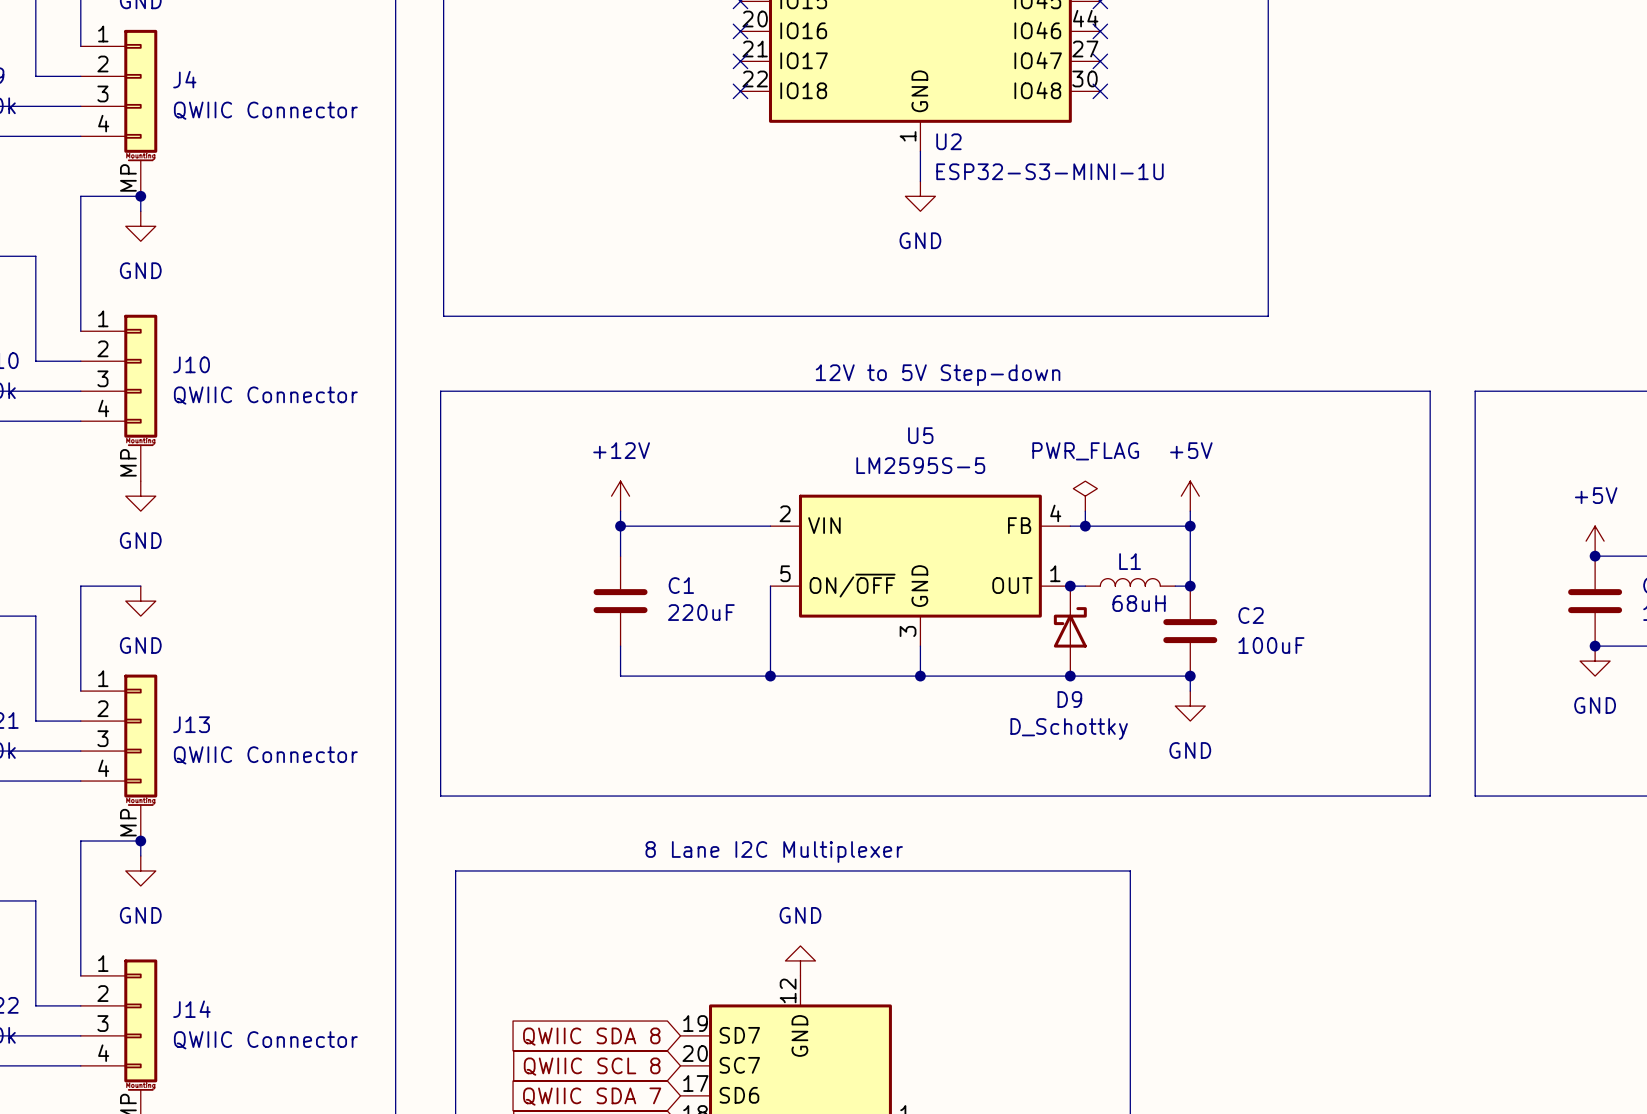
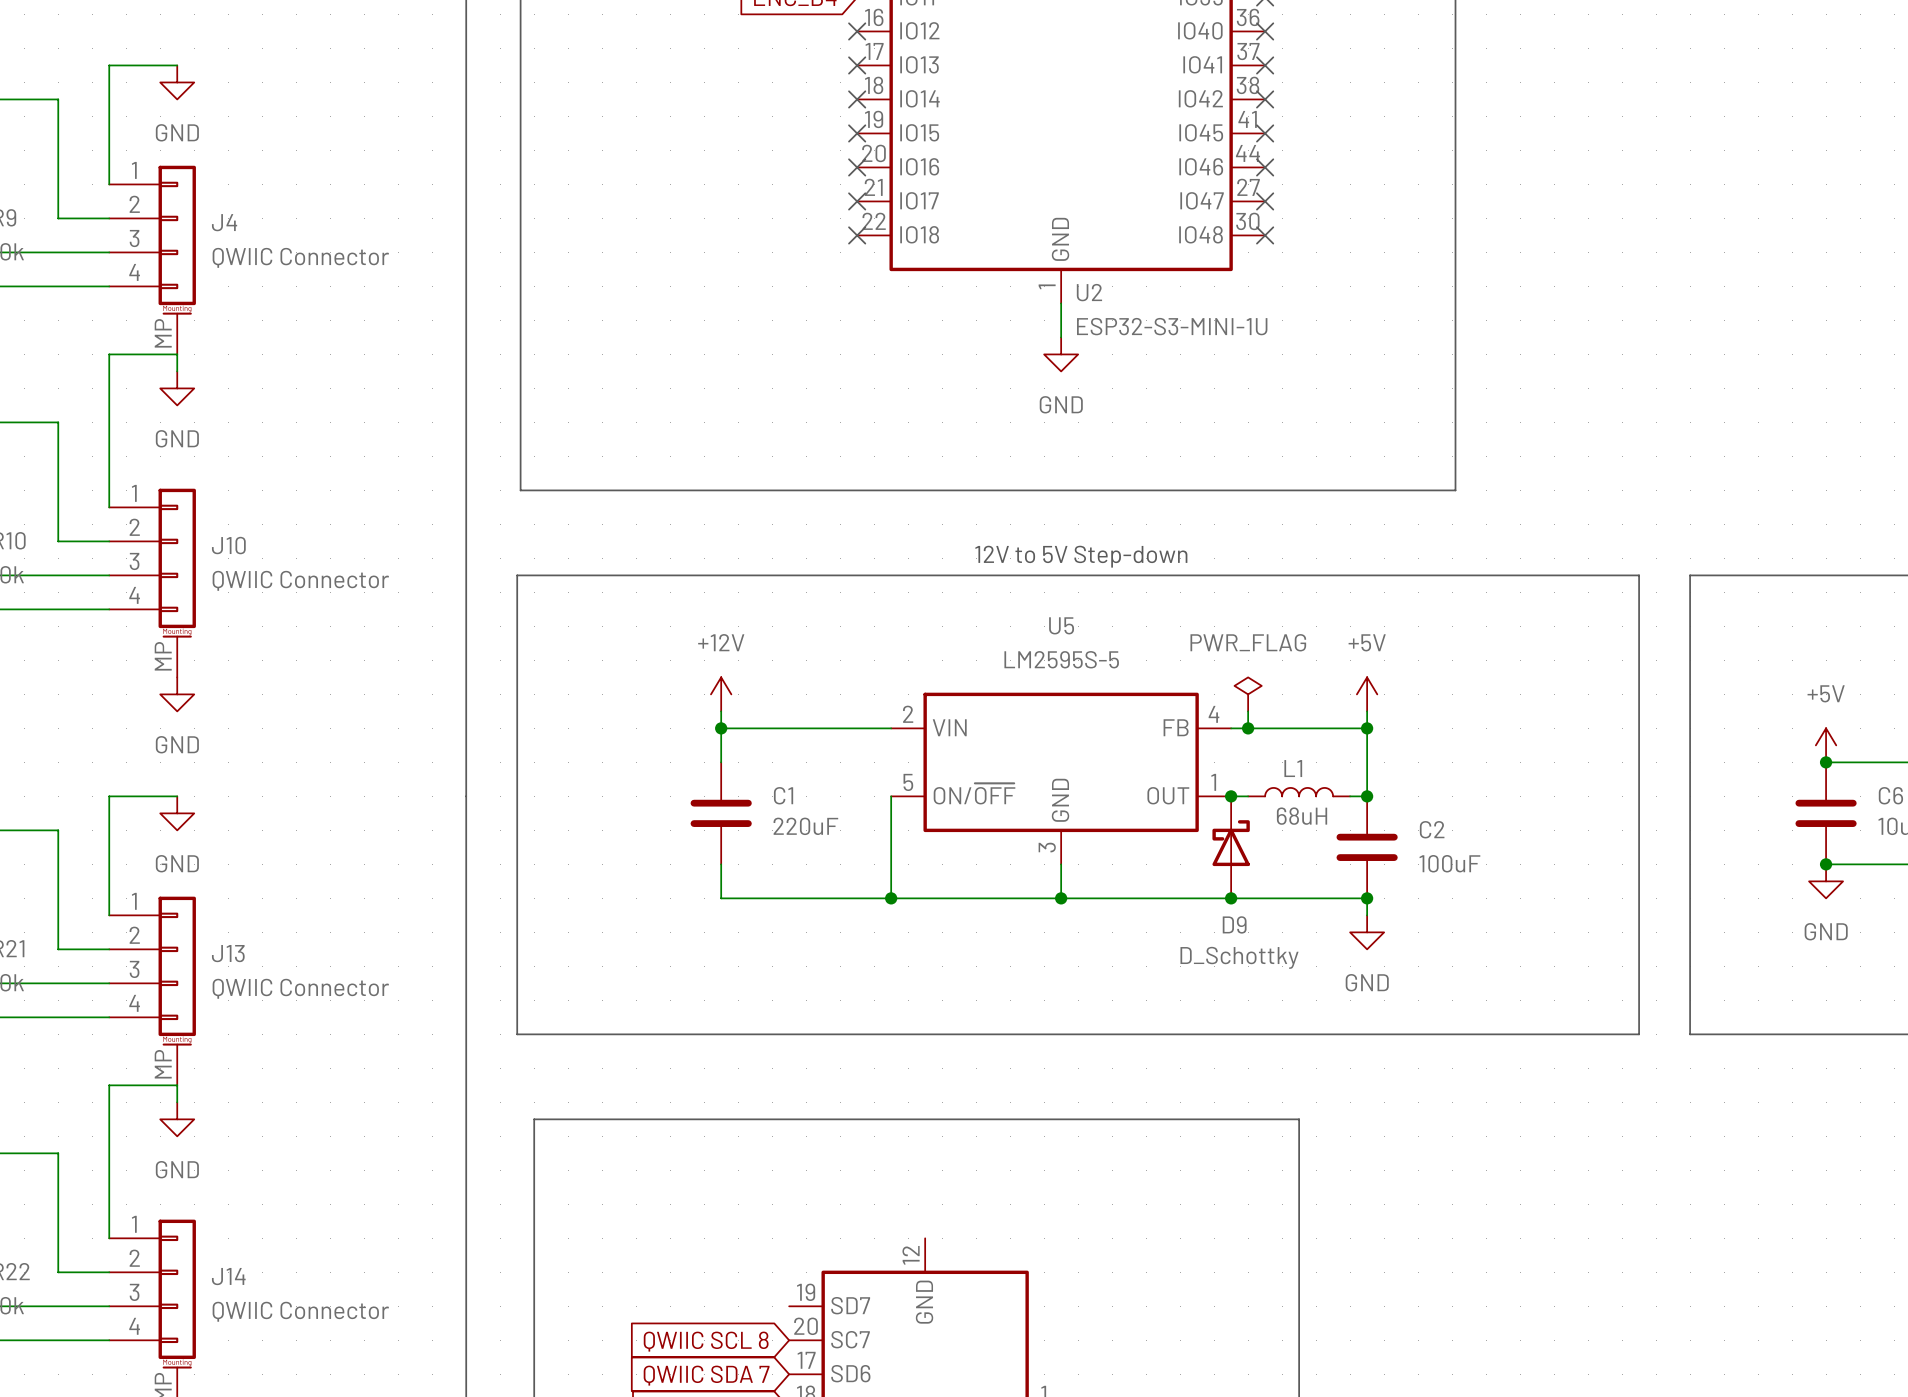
junction: (140, 196) -> none
junction: (140, 841) -> none
text: 8 Lane I2C Multiplexer (774, 851) -> none
power symbol: GND (800, 960) -> none
global label: QWIIC SDA 8 (591, 1036) -> none

